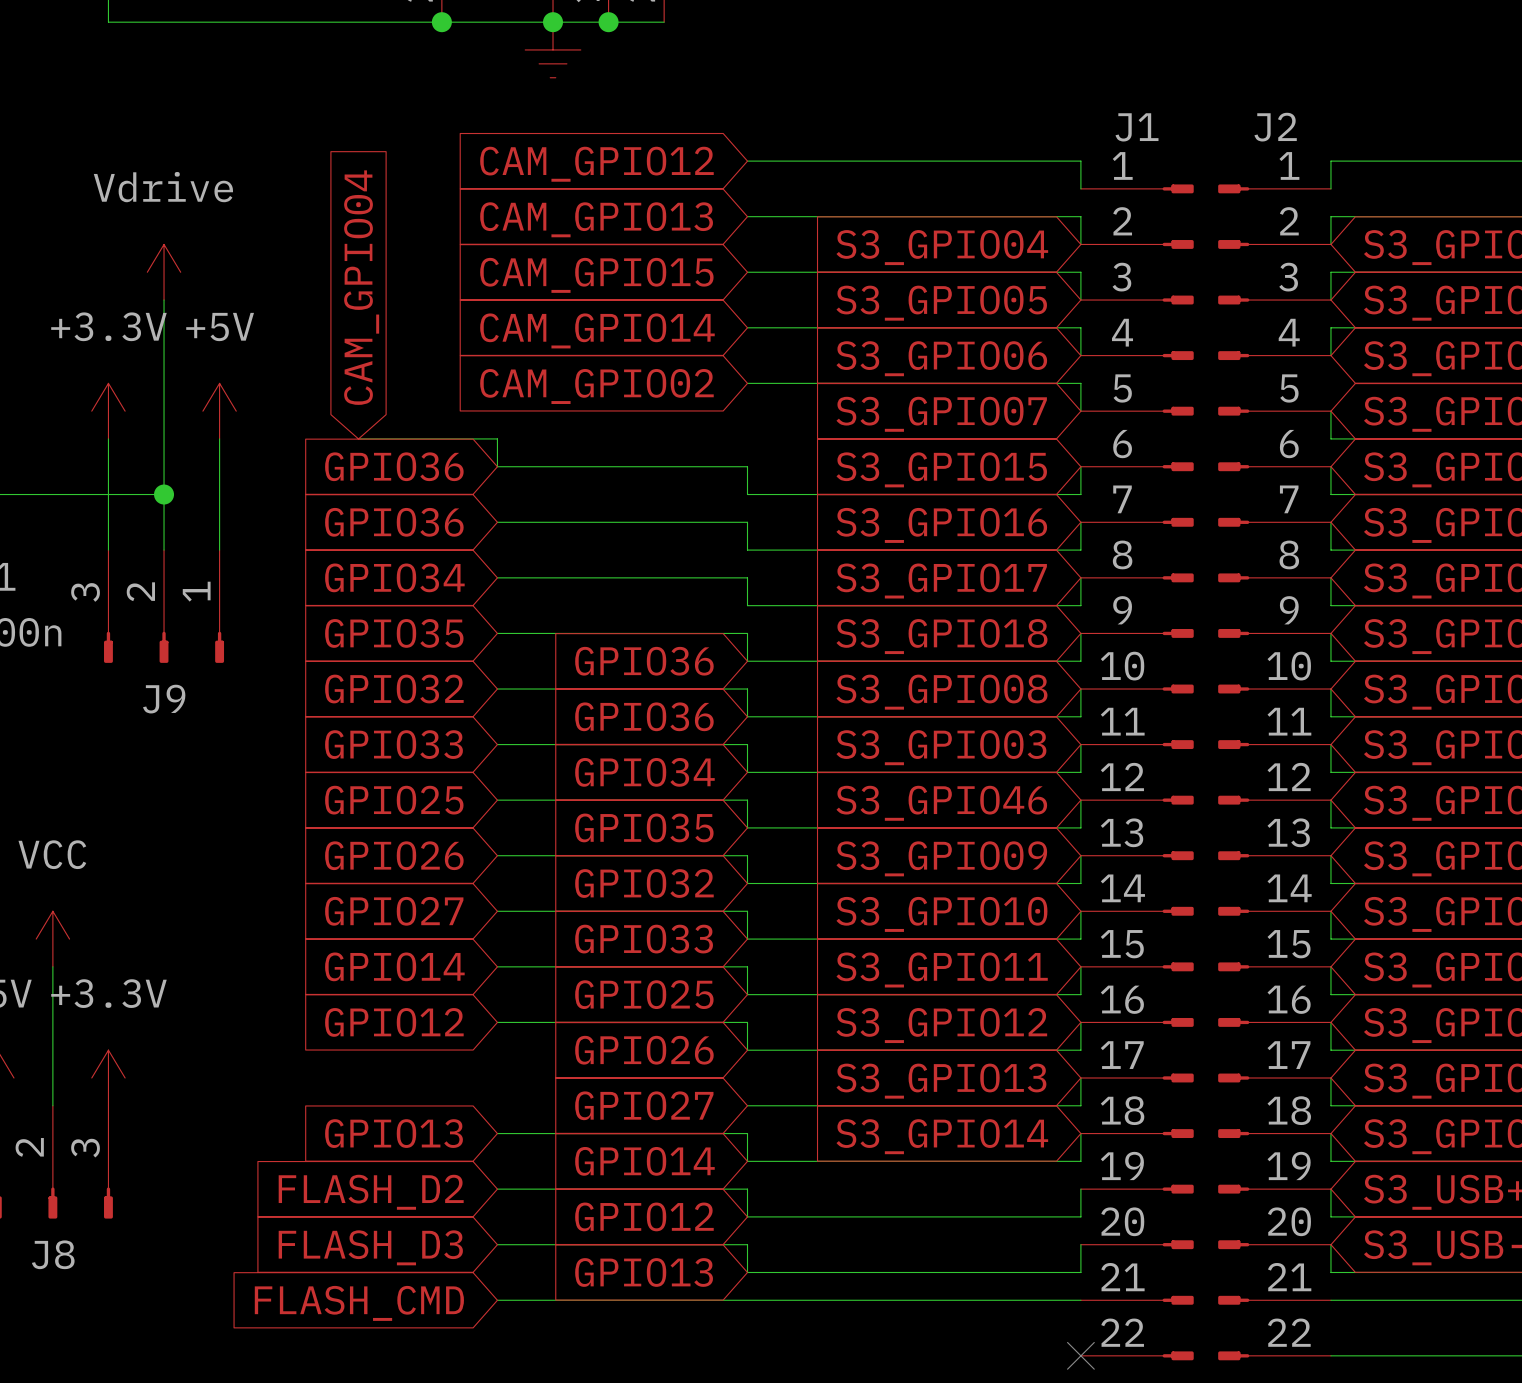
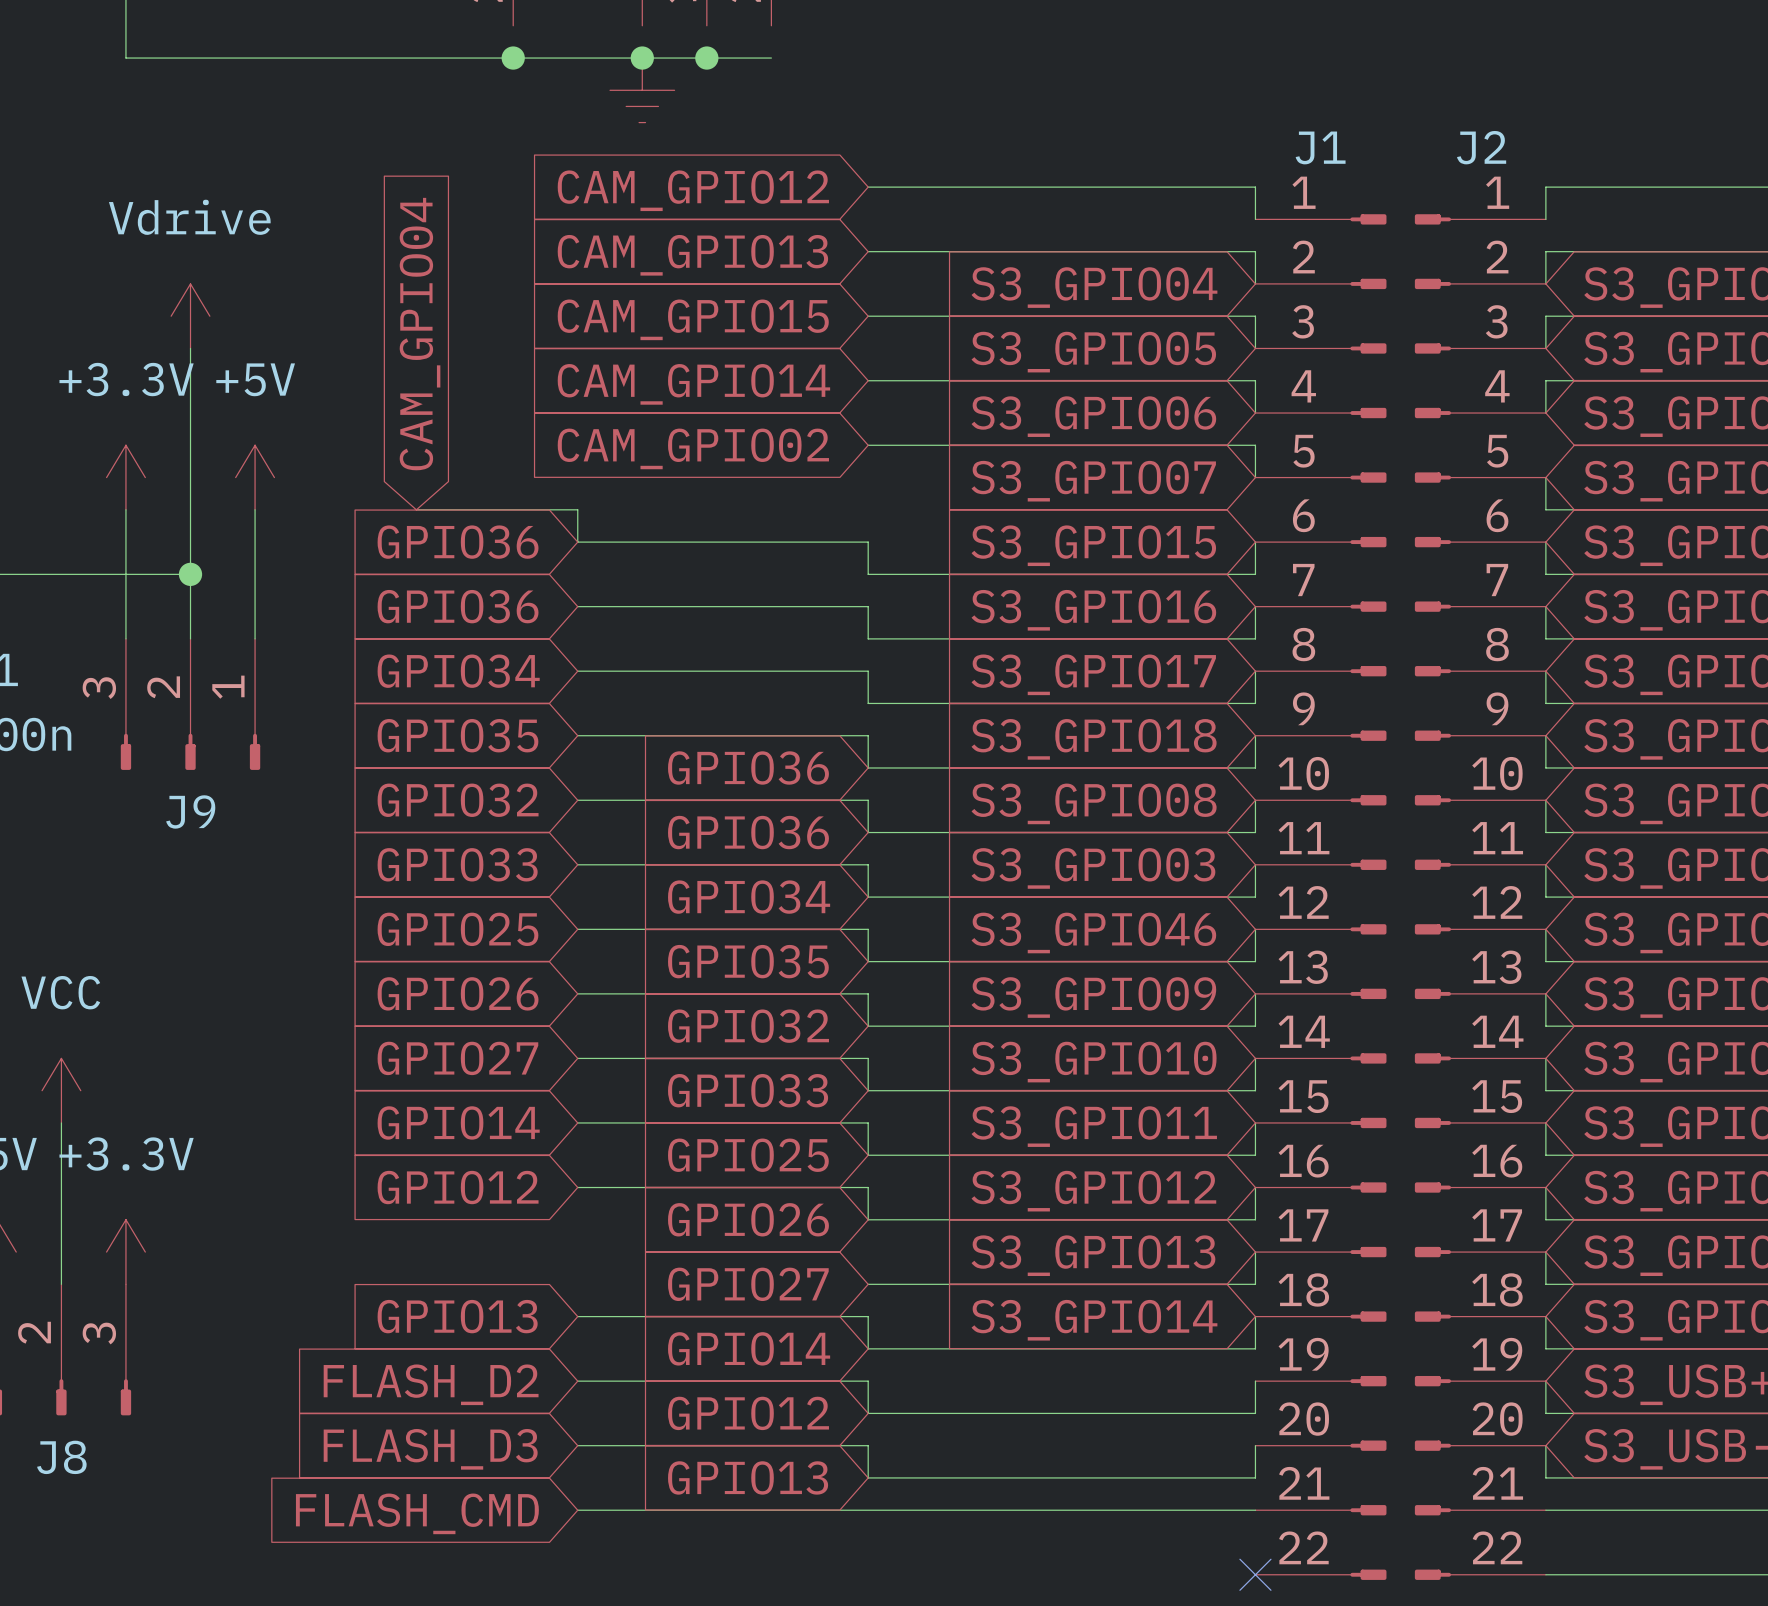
wire: (108, 22) (664, 22) -> (125, 25) (125, 58) (771, 58)
junction position: (441, 22) -> (513, 58)
junction position: (553, 22) -> (642, 58)
junction position: (608, 22) -> (706, 58)
power symbol position: (553, 49) -> (642, 90)

